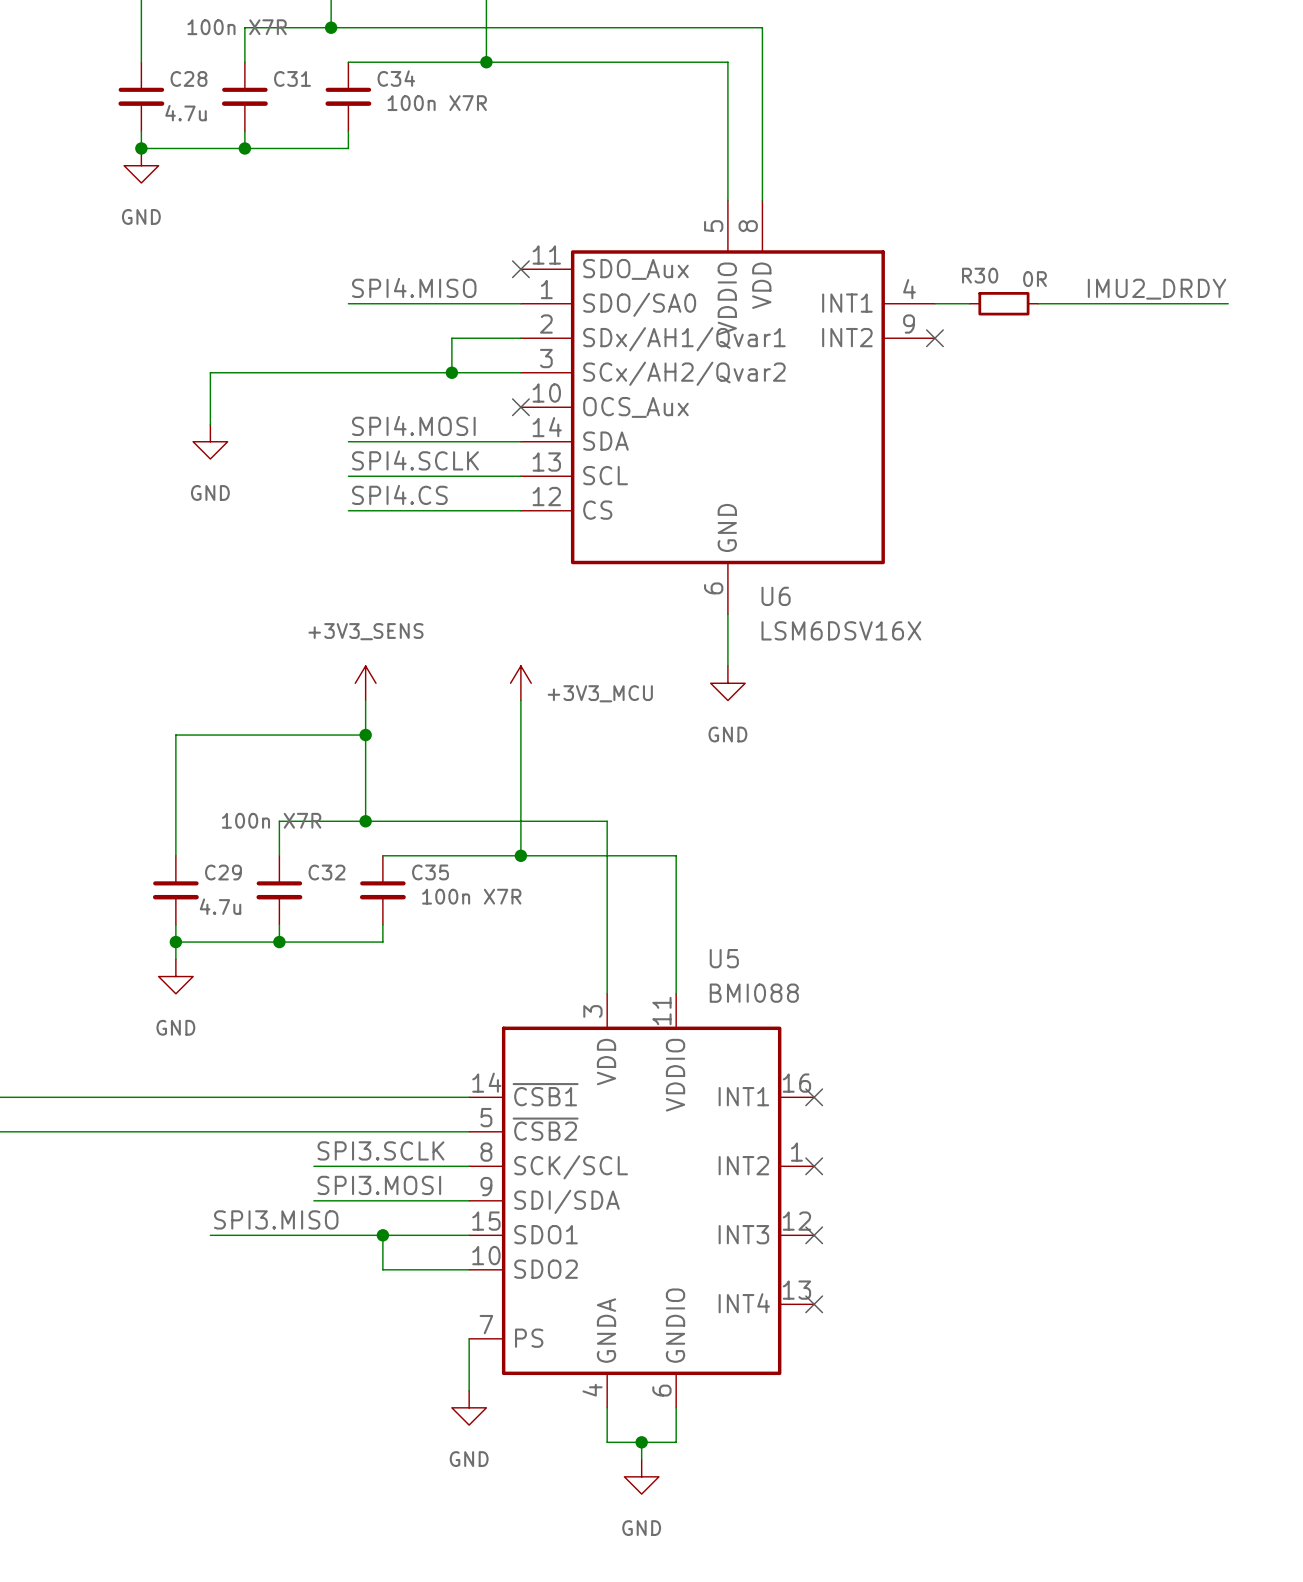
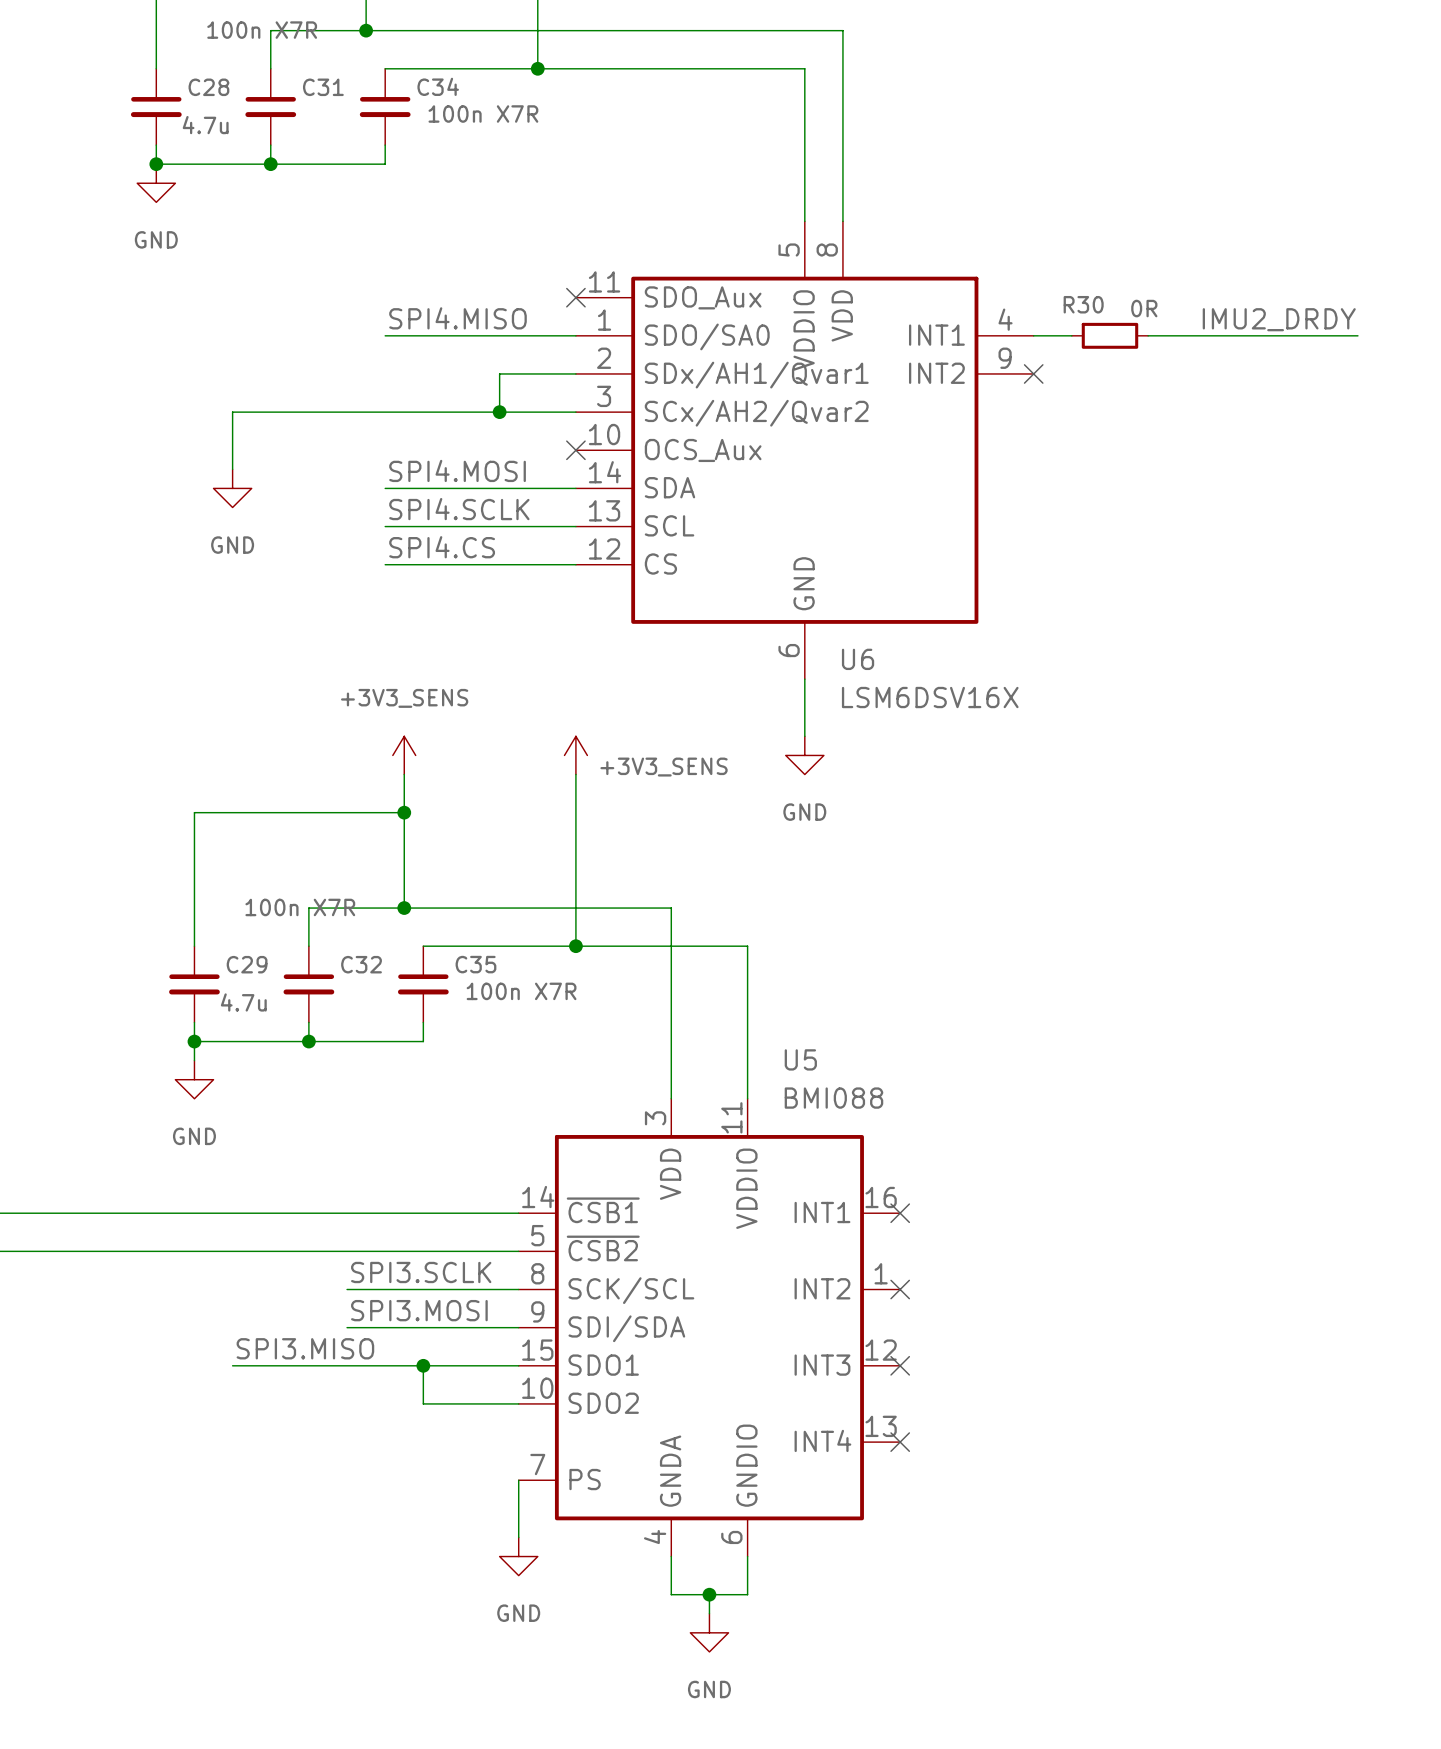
power symbol: +3V3_MCU (520, 683) -> +3V3_SENS (575, 755)

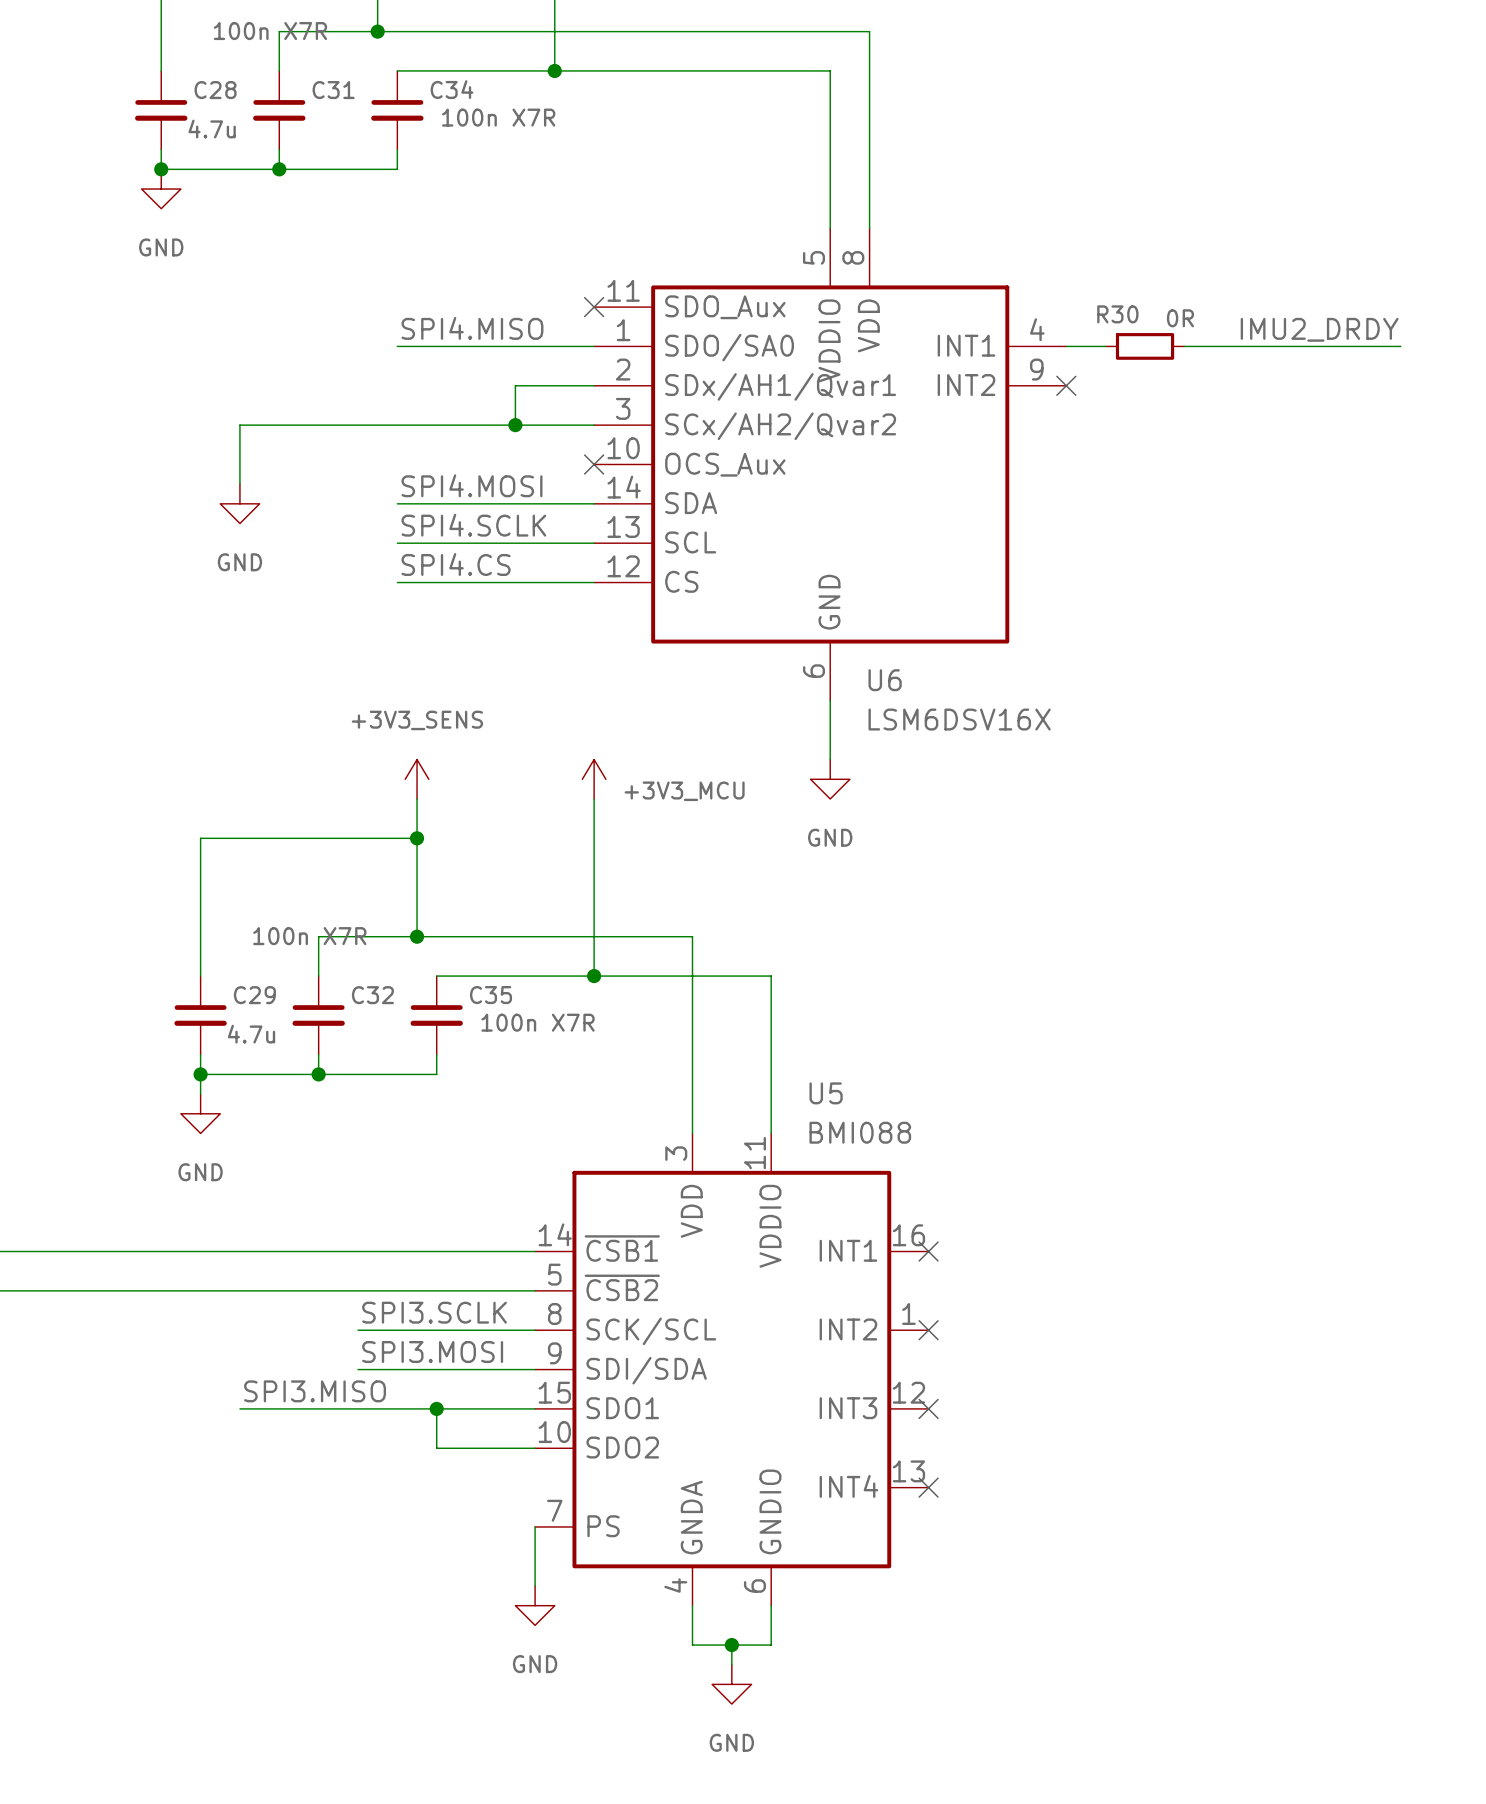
power symbol: +3V3_SENS (575, 755) -> +3V3_MCU (594, 779)

